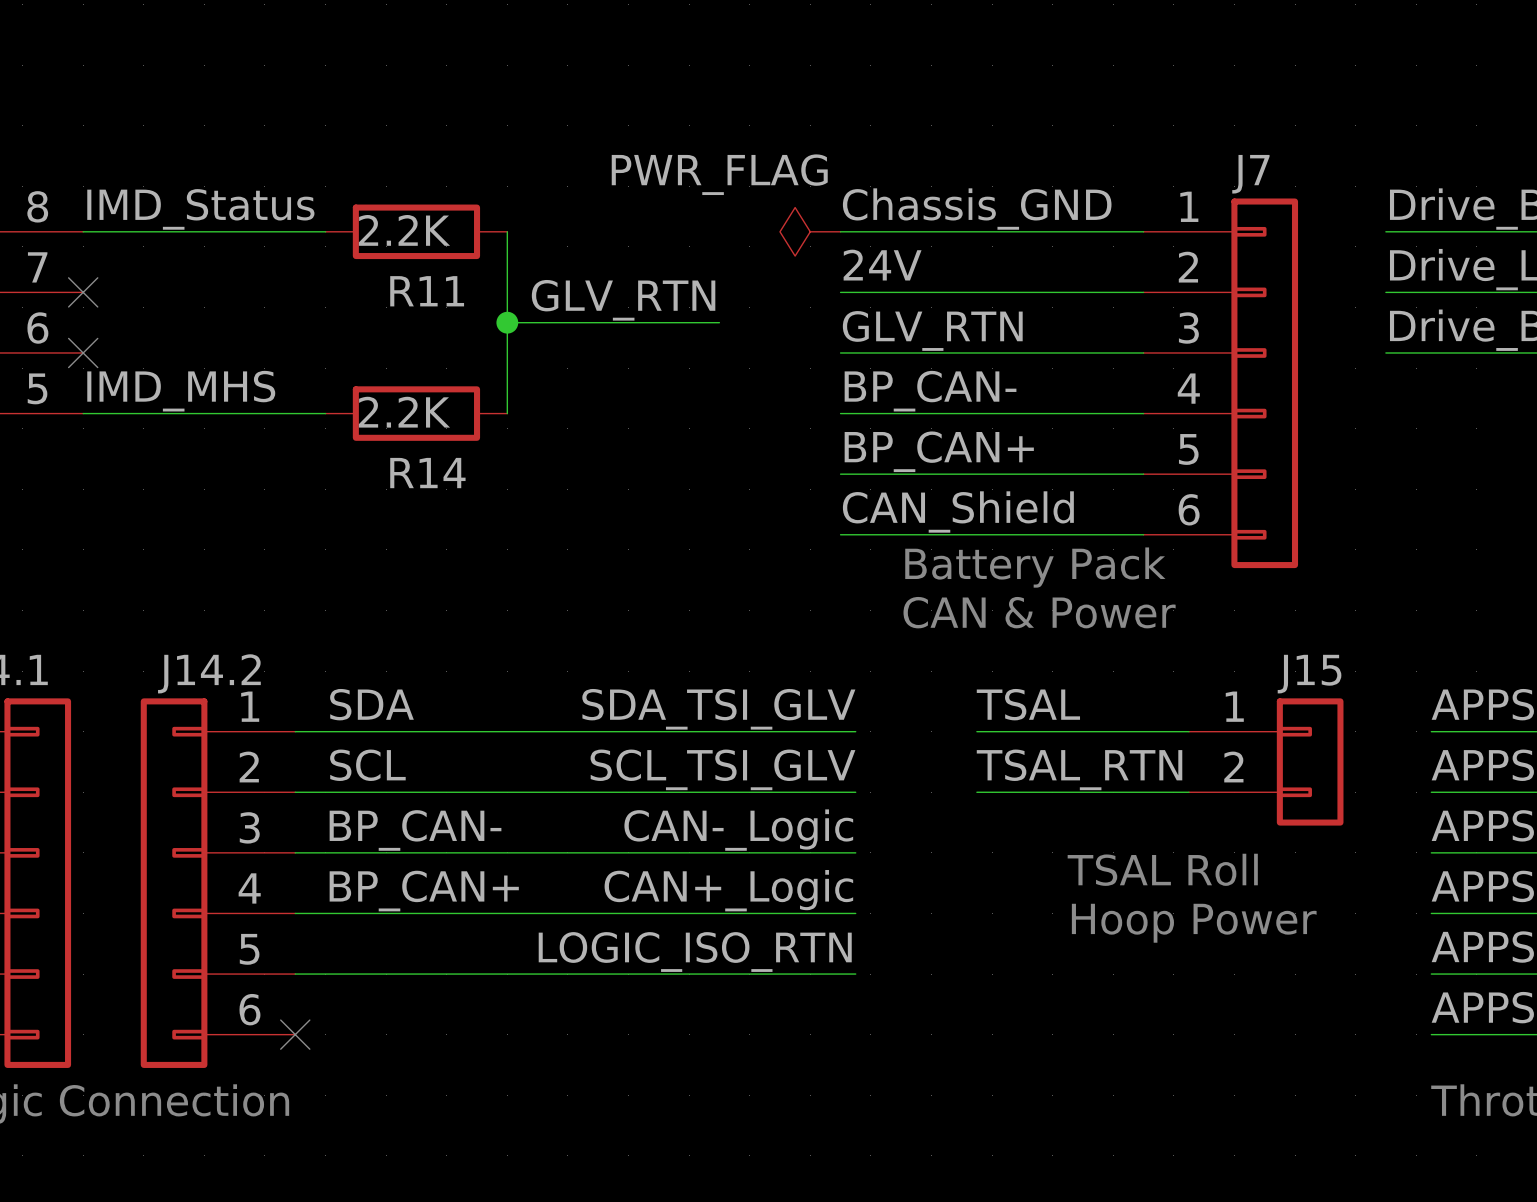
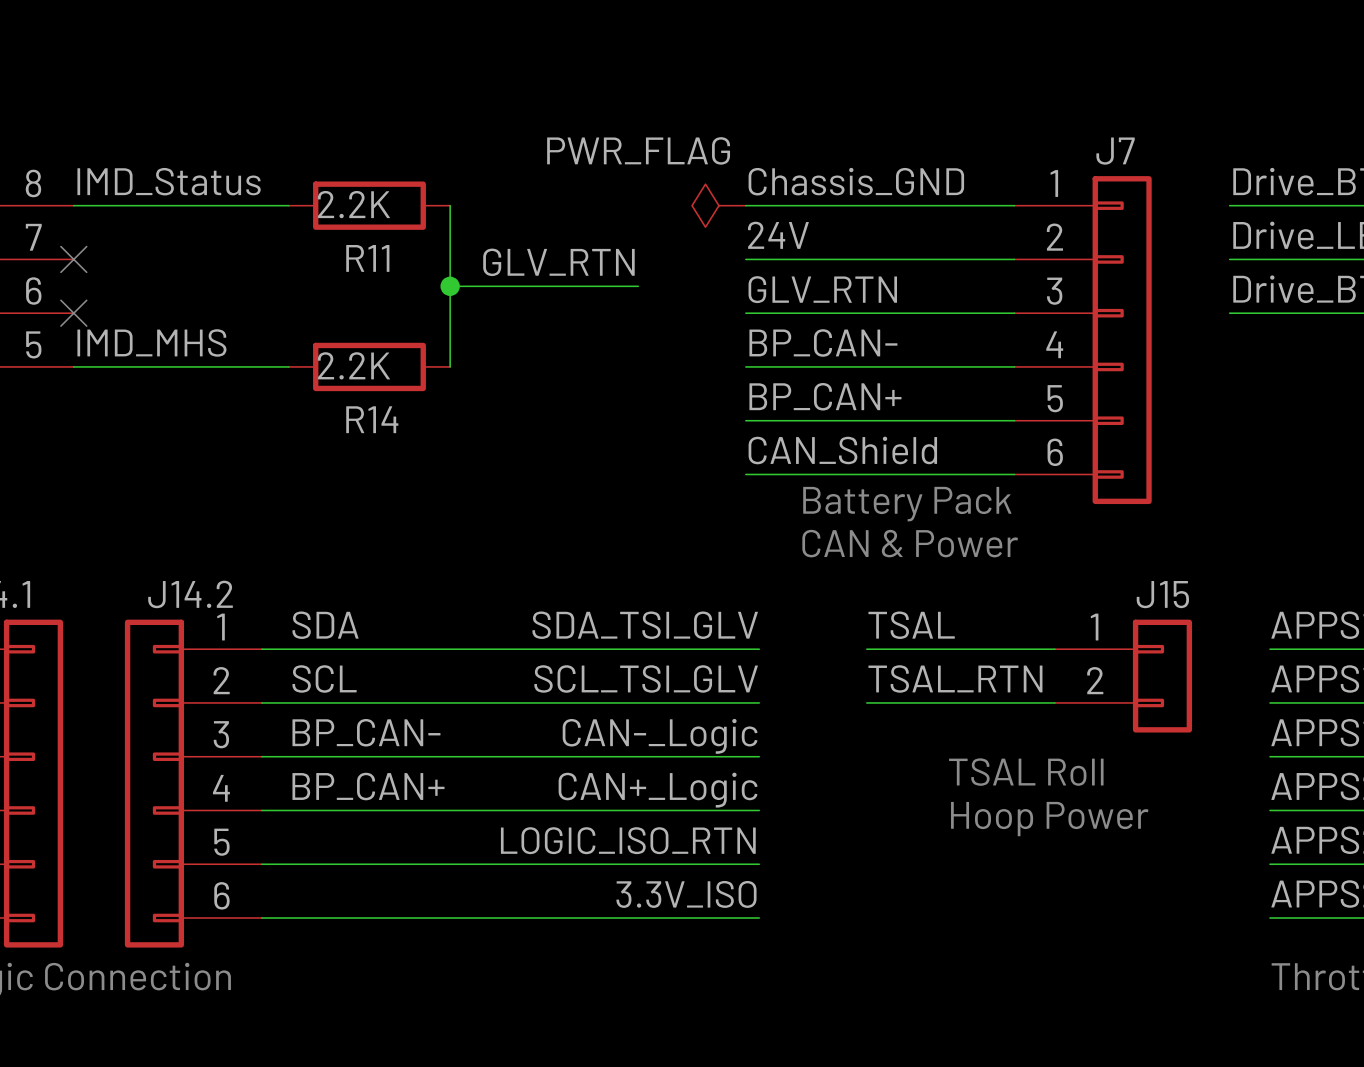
label: none -> 3.3V_ISO (686, 894)
wire: none -> (261, 918) (759, 918)
no-connect mark: (295, 1034) -> none

